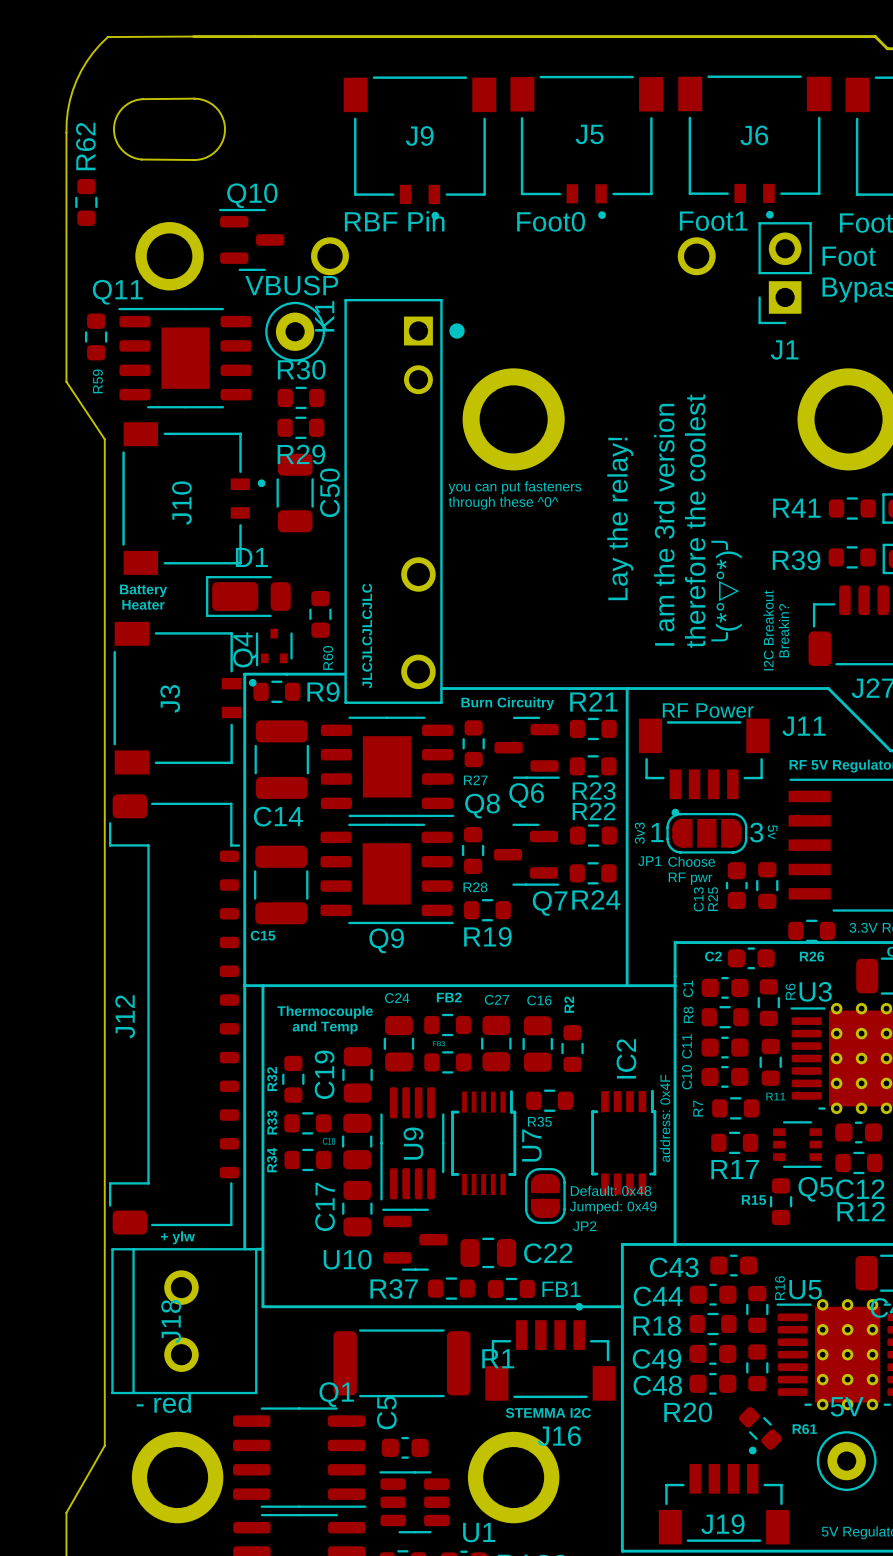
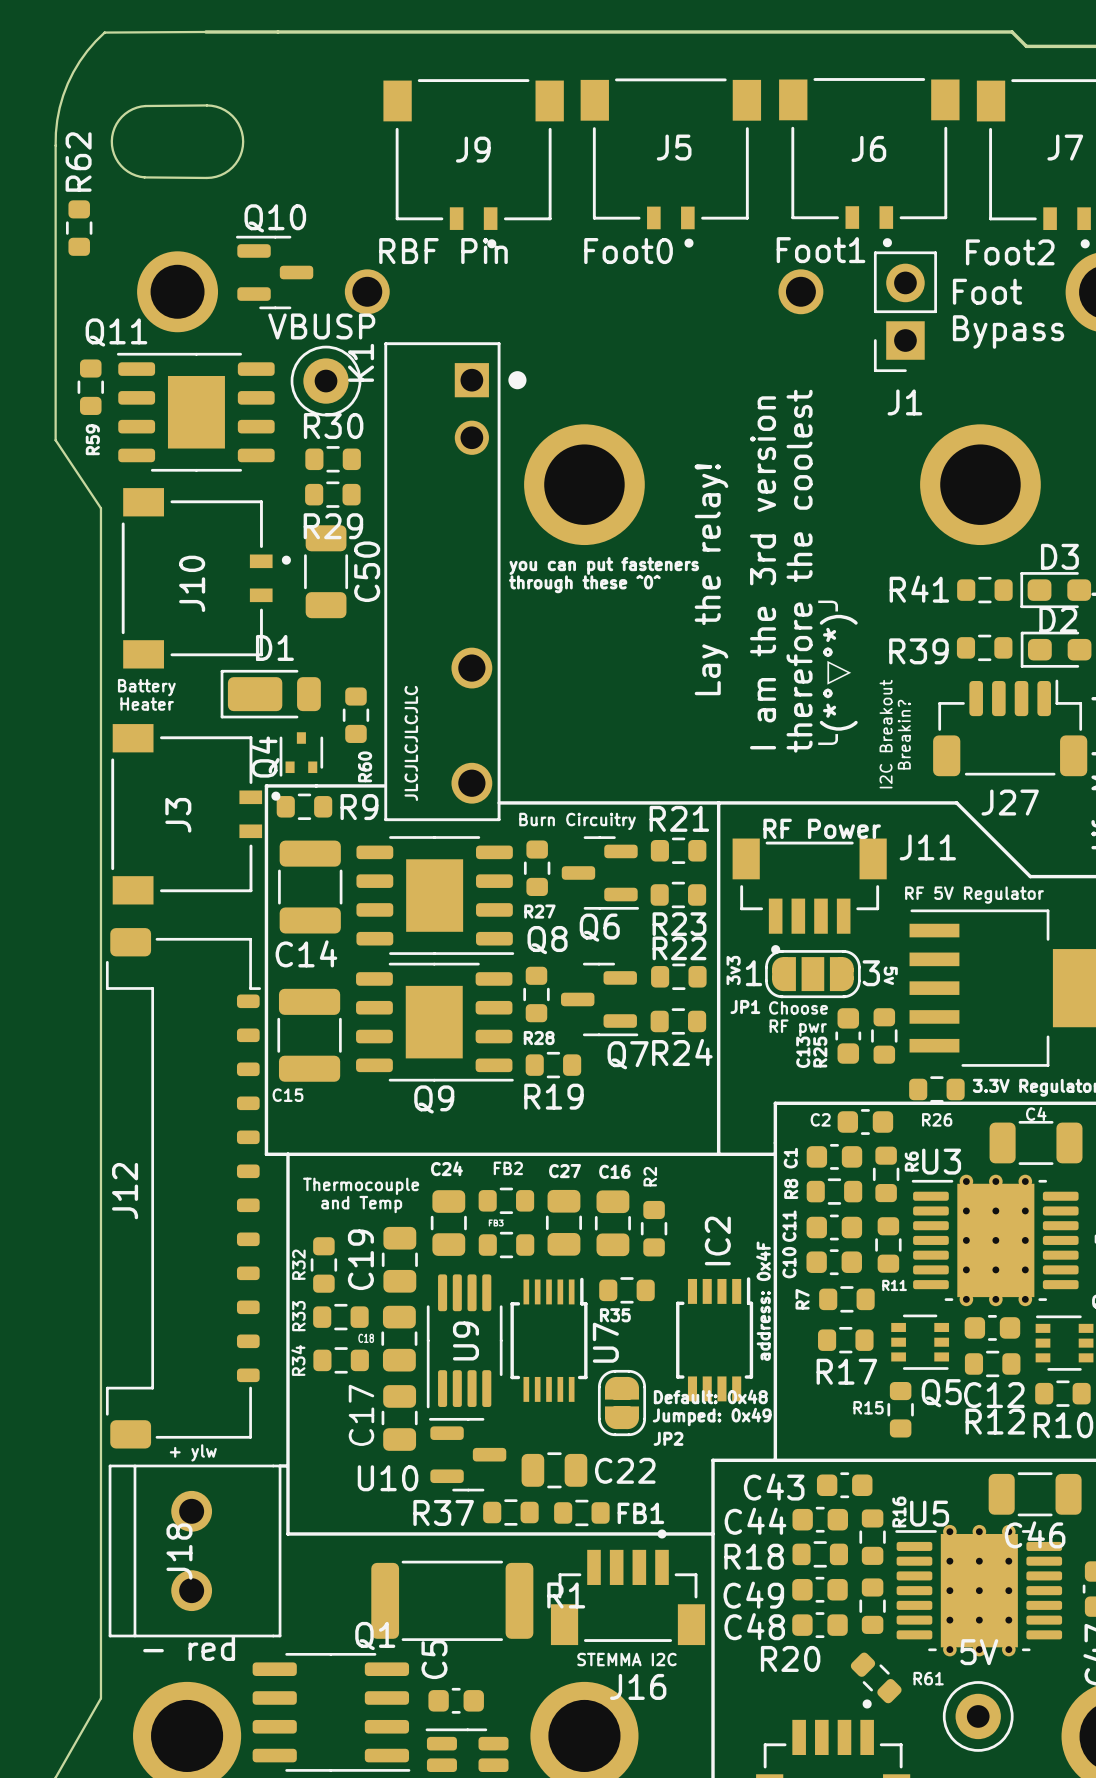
line: (244, 985) (244, 1249) -> none

